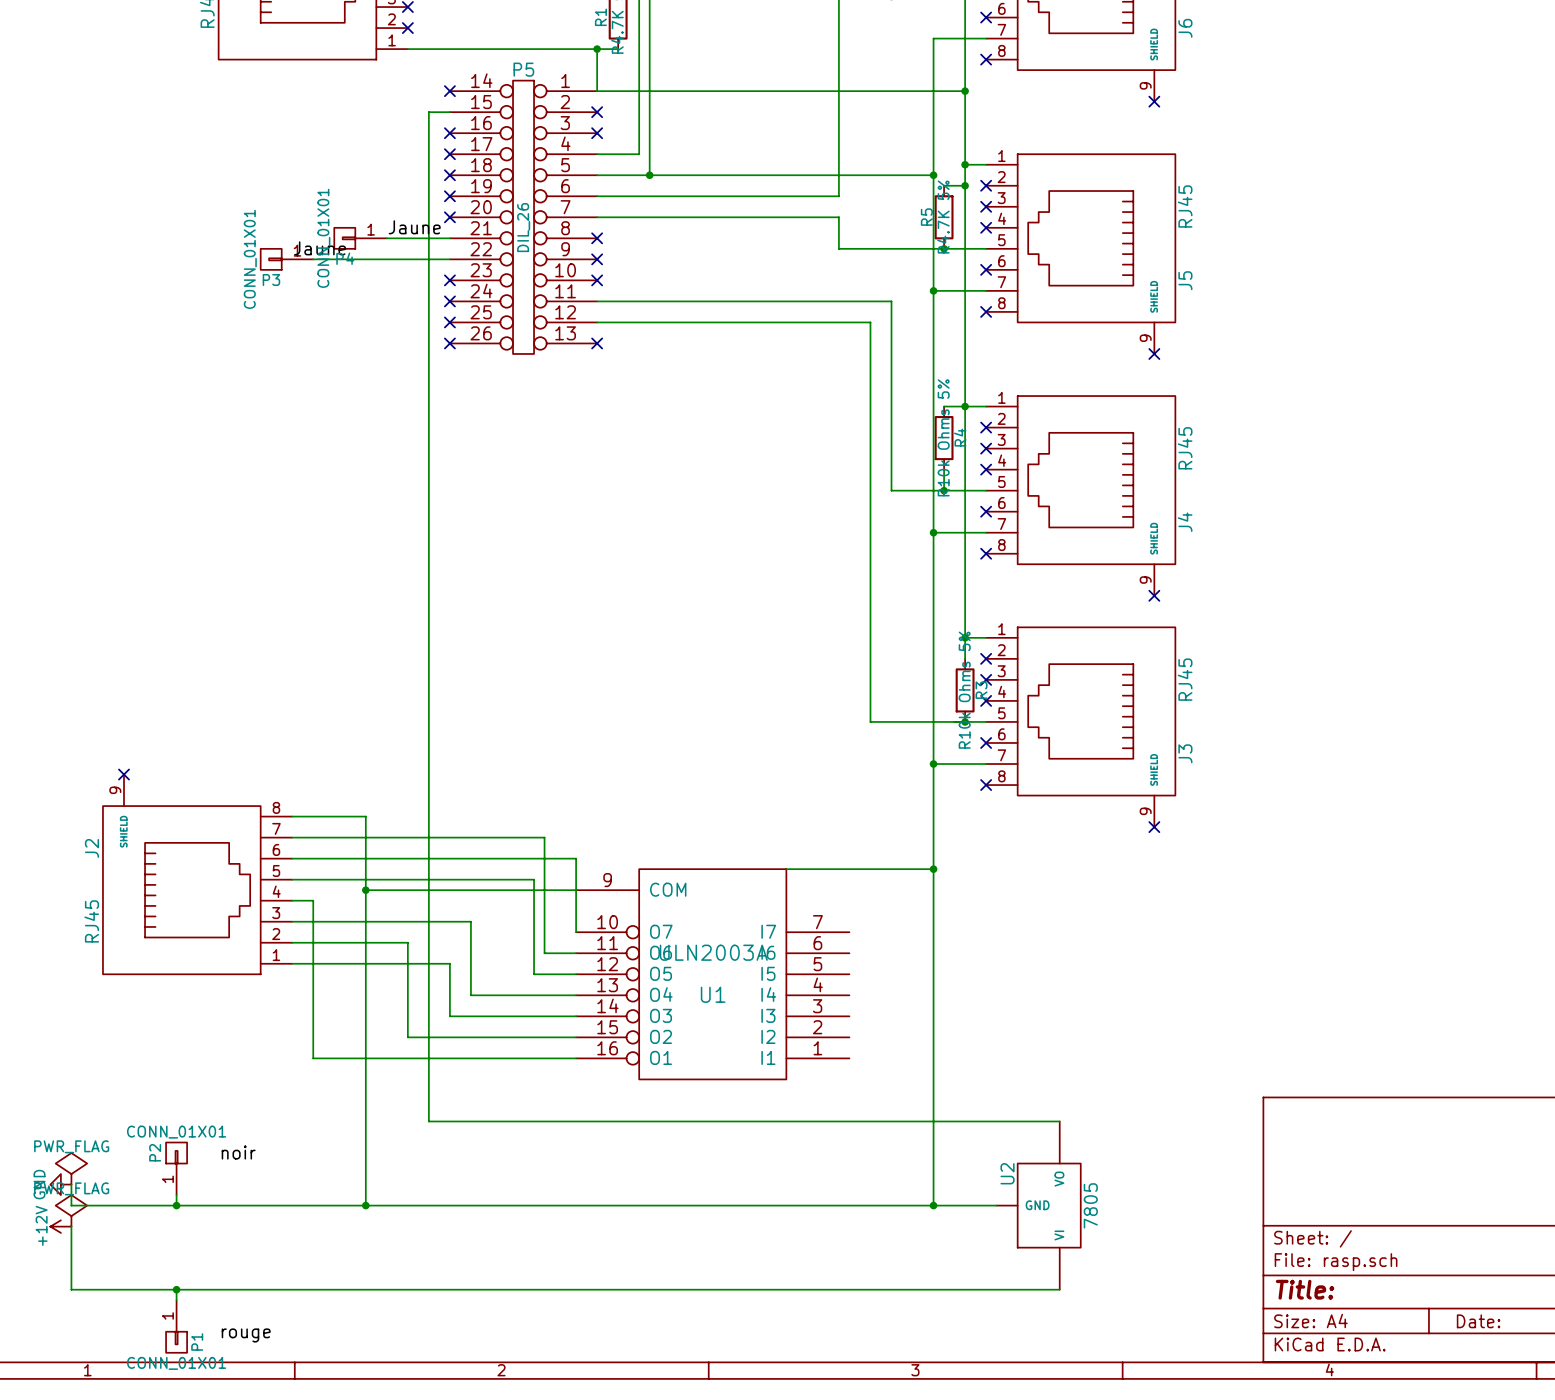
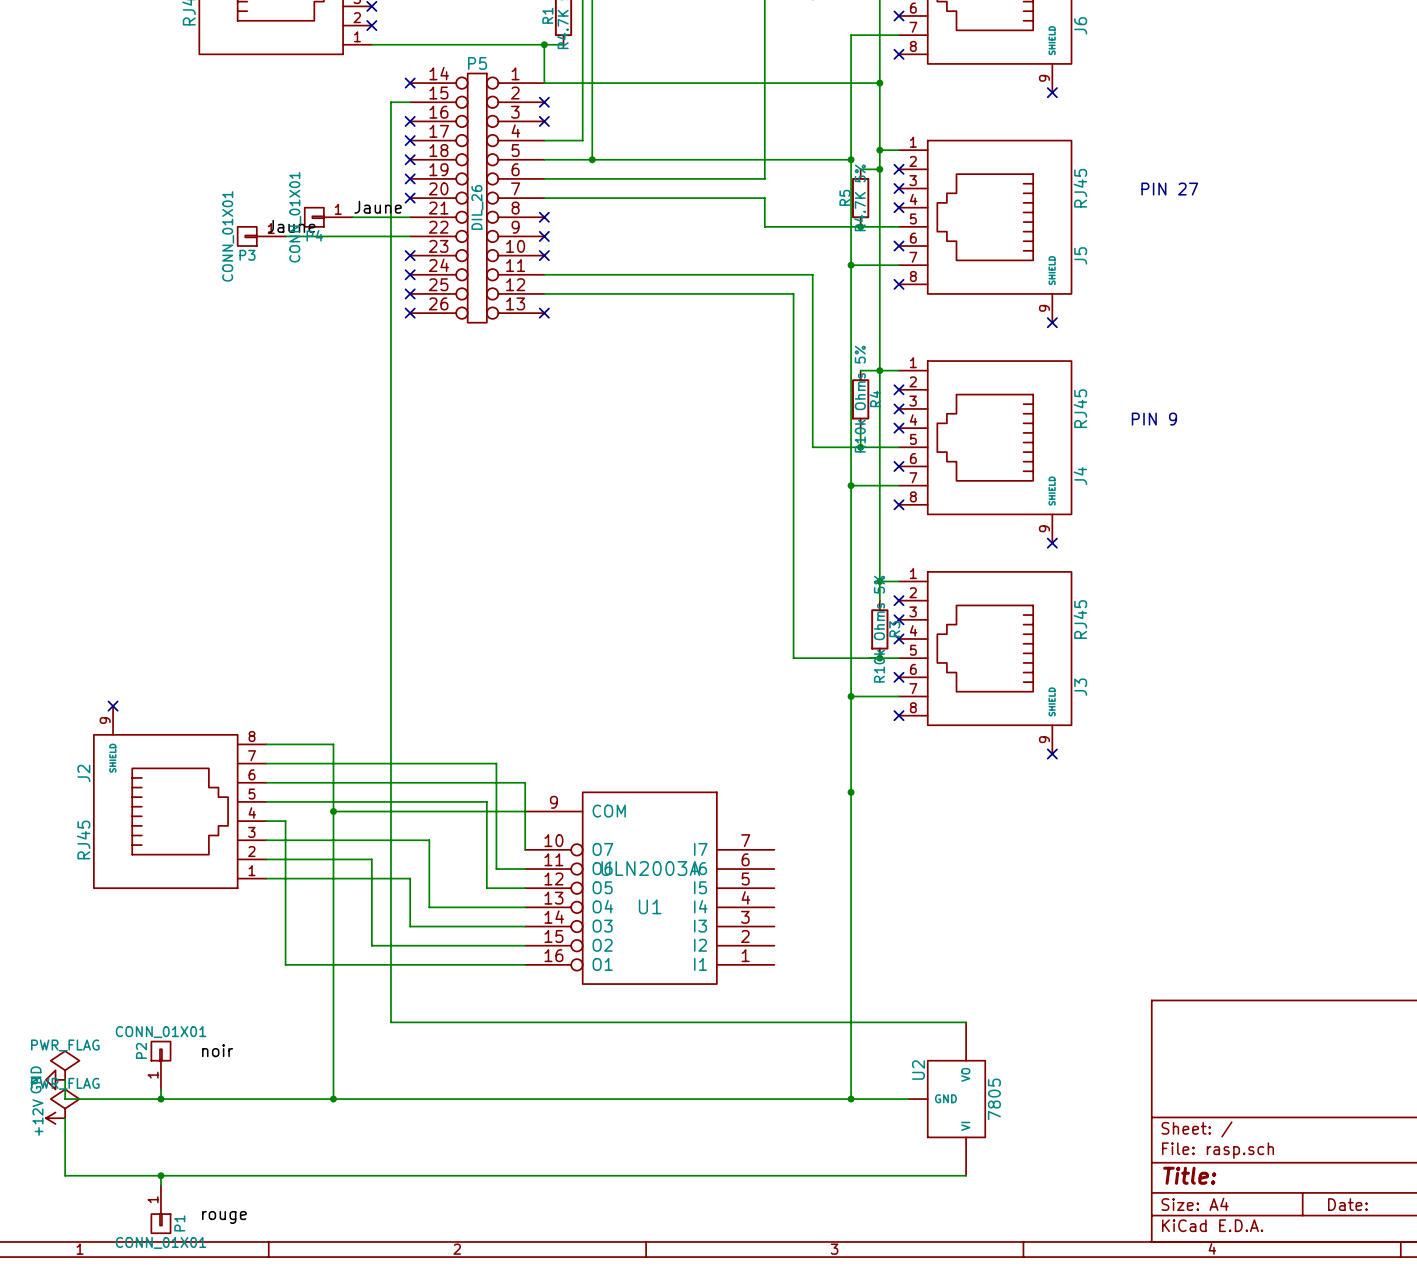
text: none -> PIN 27 (1169, 189)
text: none -> PIN 9 (1154, 419)
wire: (786, 869) (933, 869) -> none

